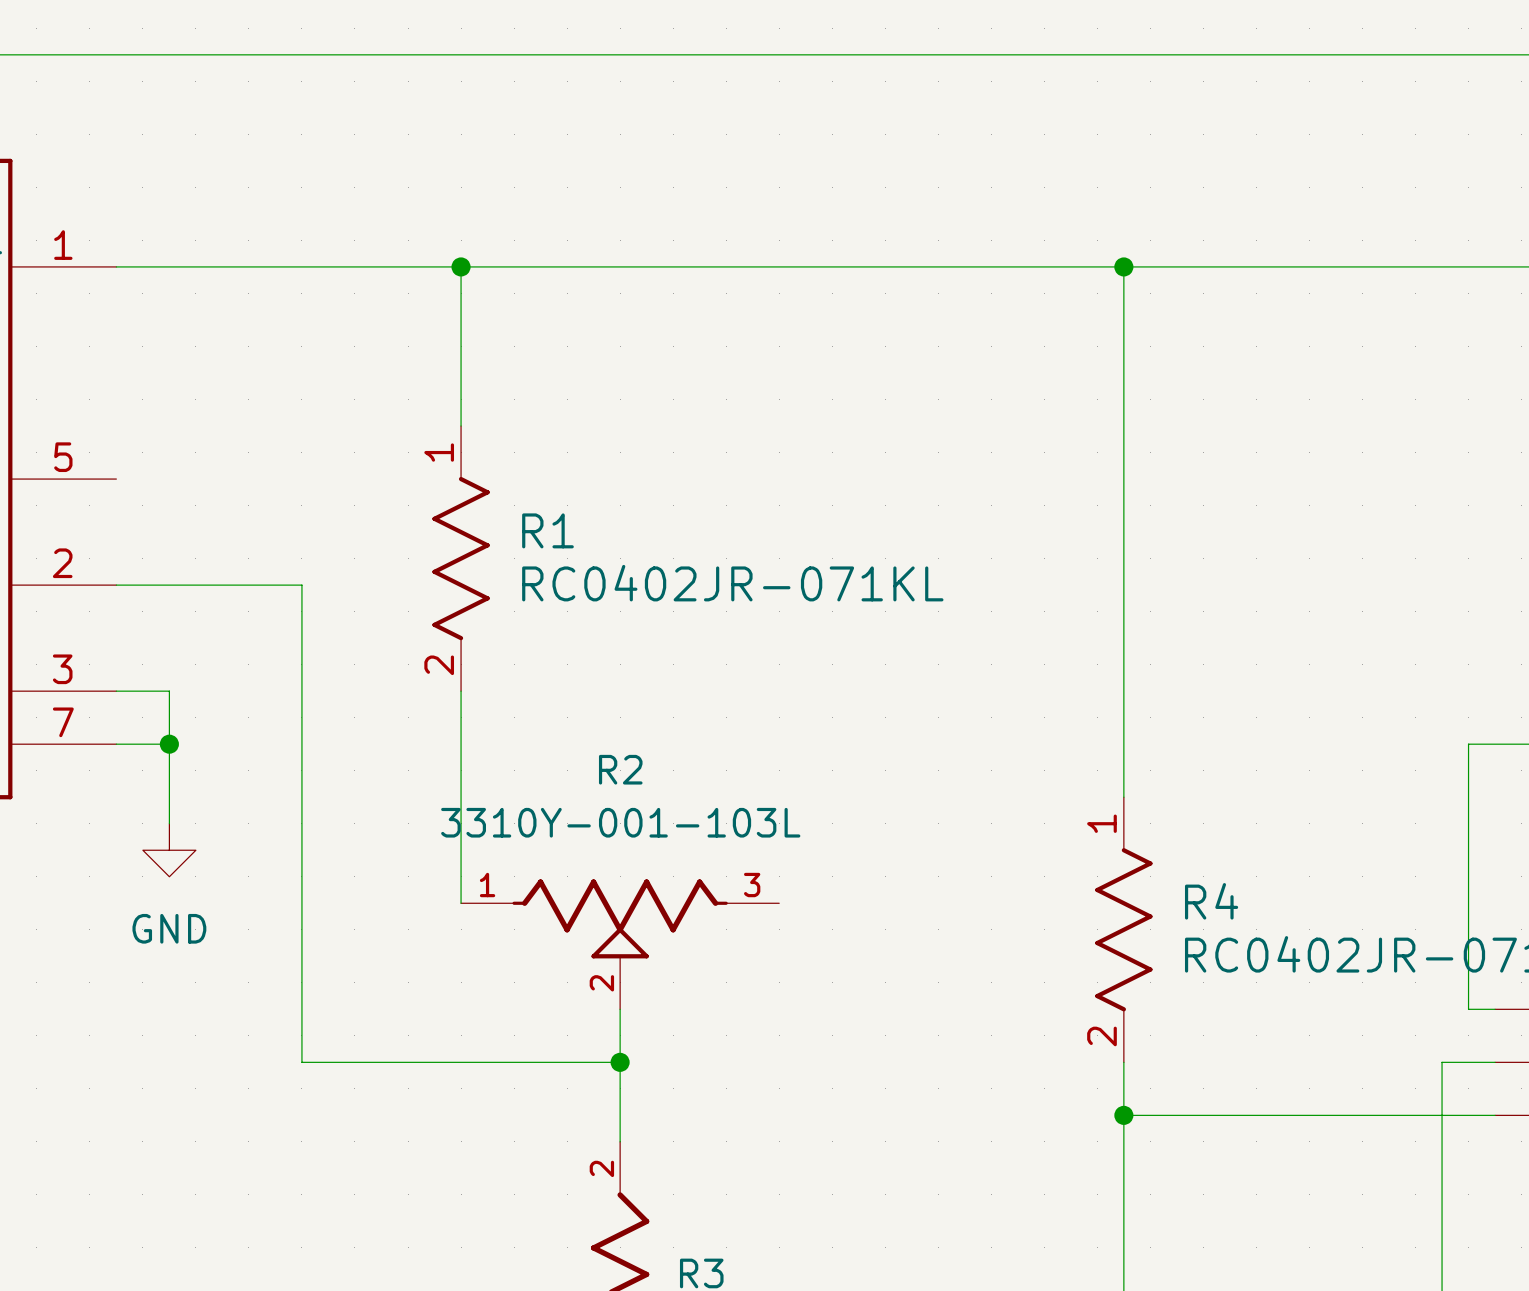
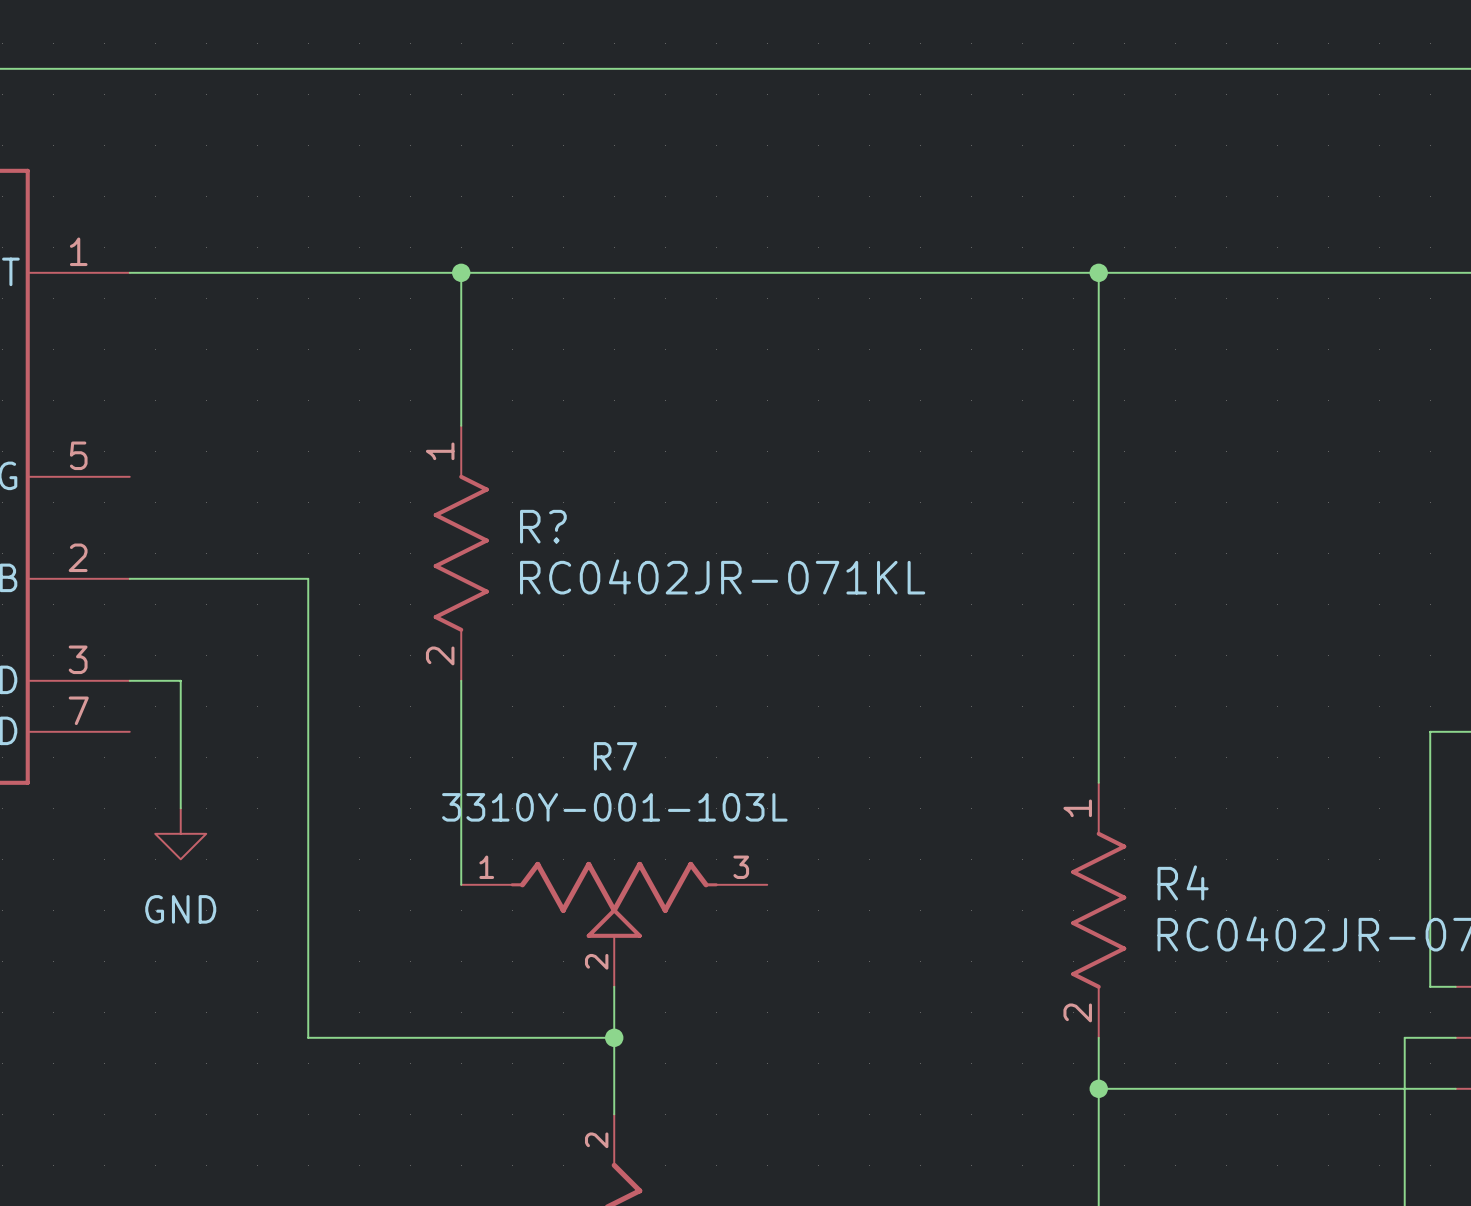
R1 name: R1 (547, 530) -> R? (543, 526)
wire: (116, 744) (169, 744) -> none
junction: (169, 744) -> none
R2 name: R2 (620, 769) -> R7 (615, 756)

